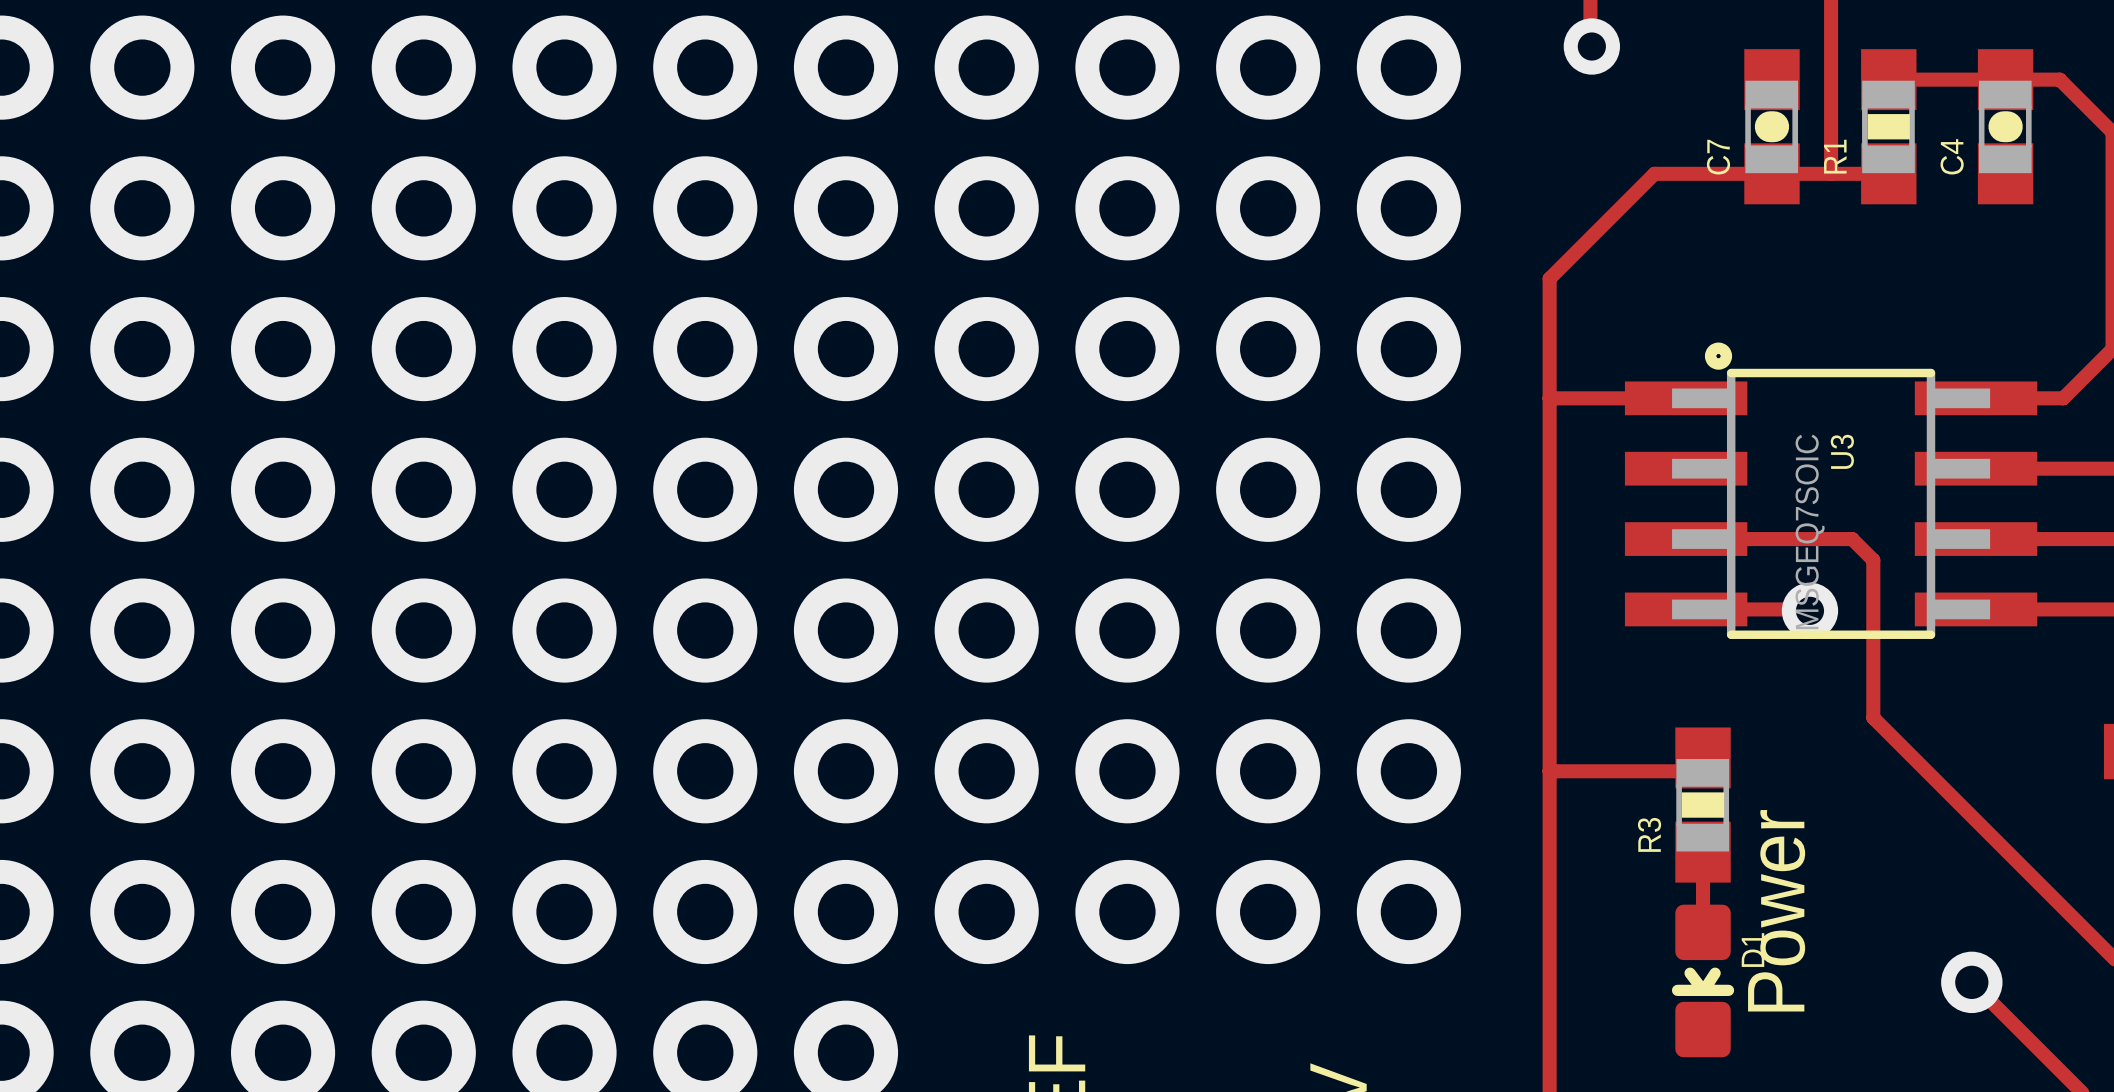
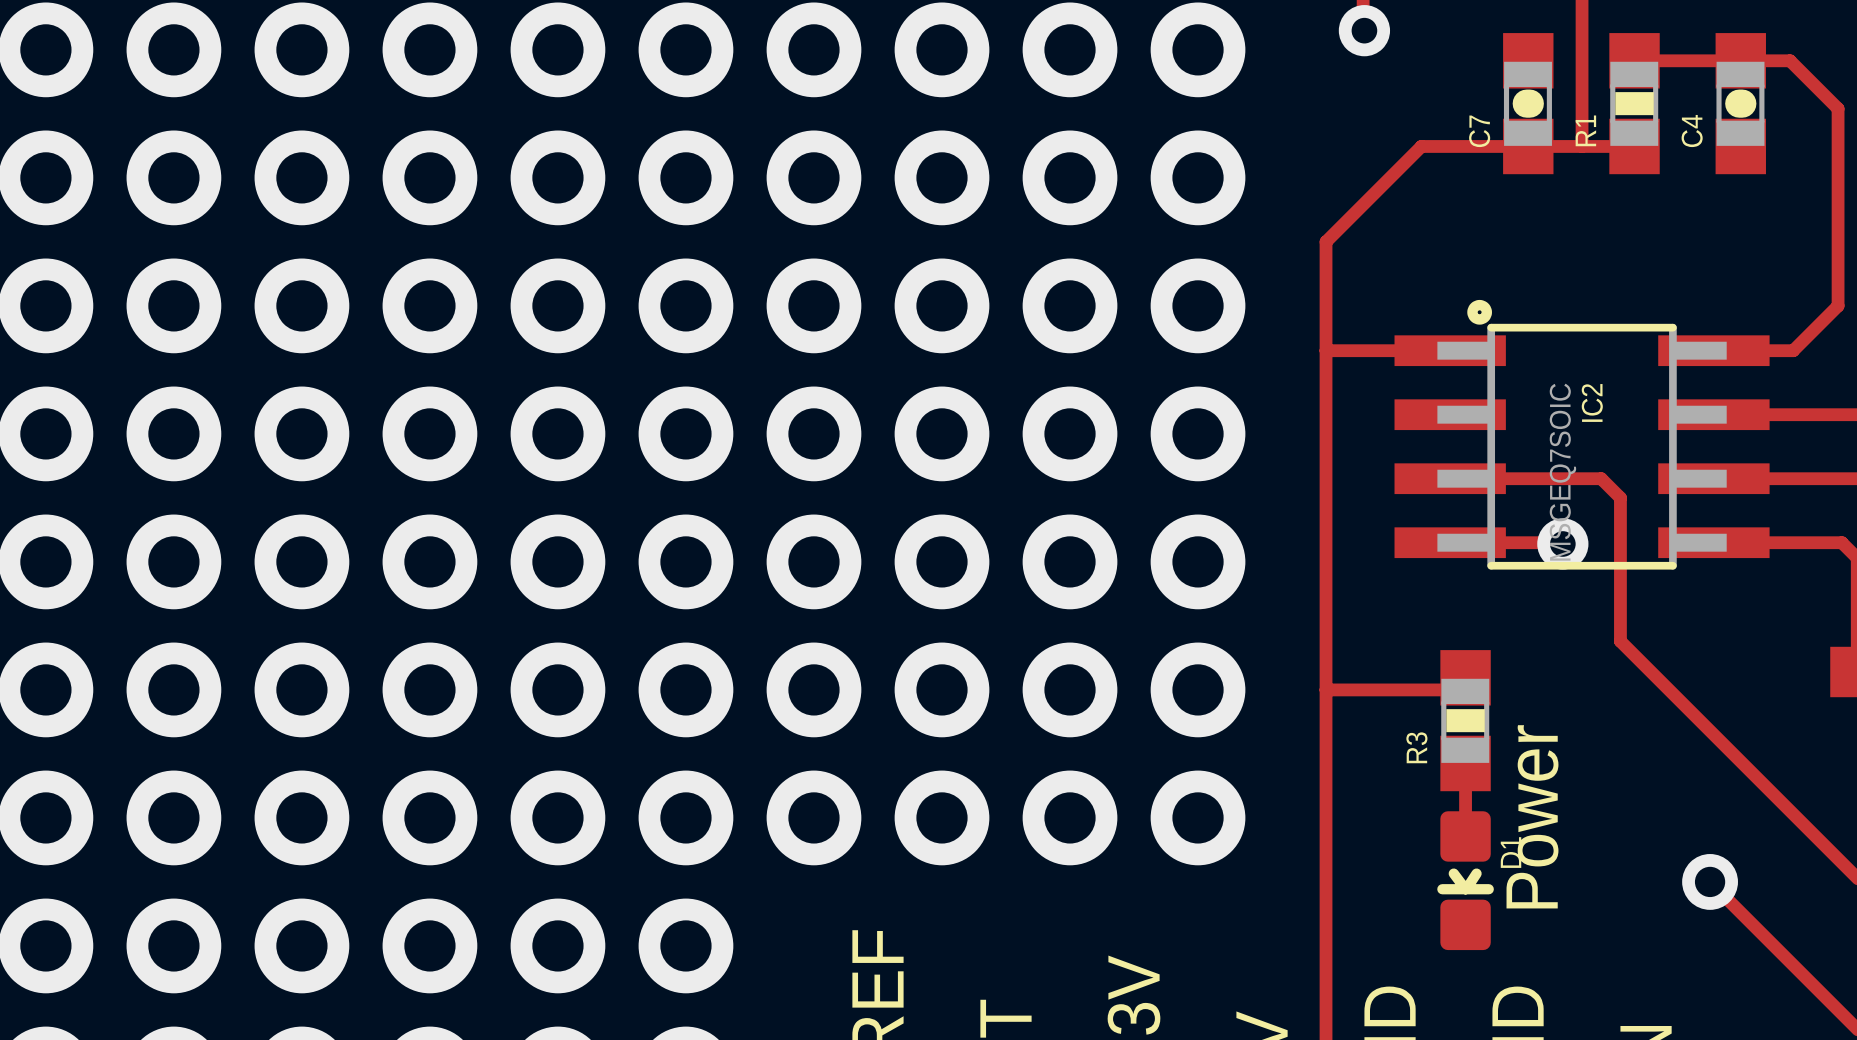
U3 name: U3 (1842, 451) -> IC2 (1592, 402)

